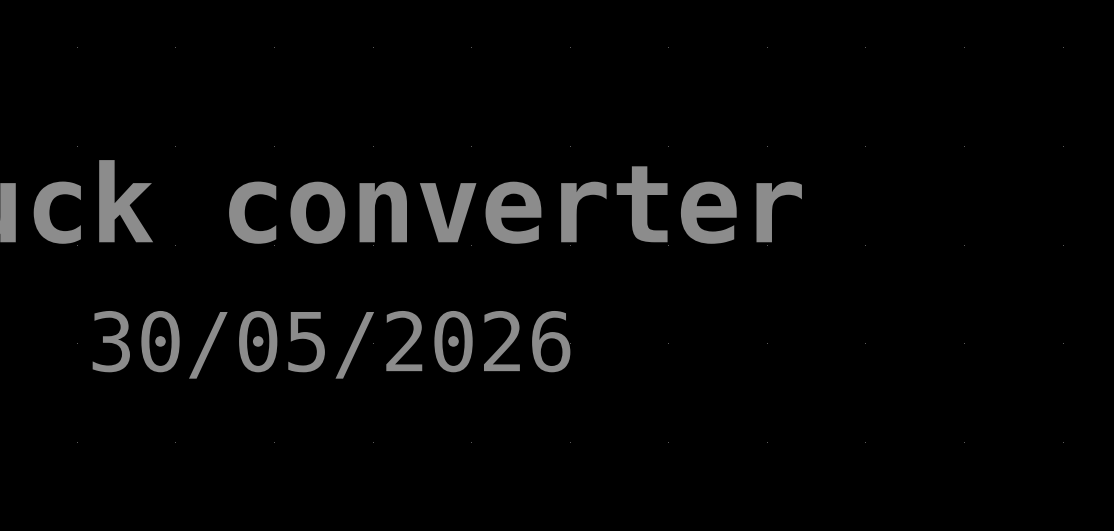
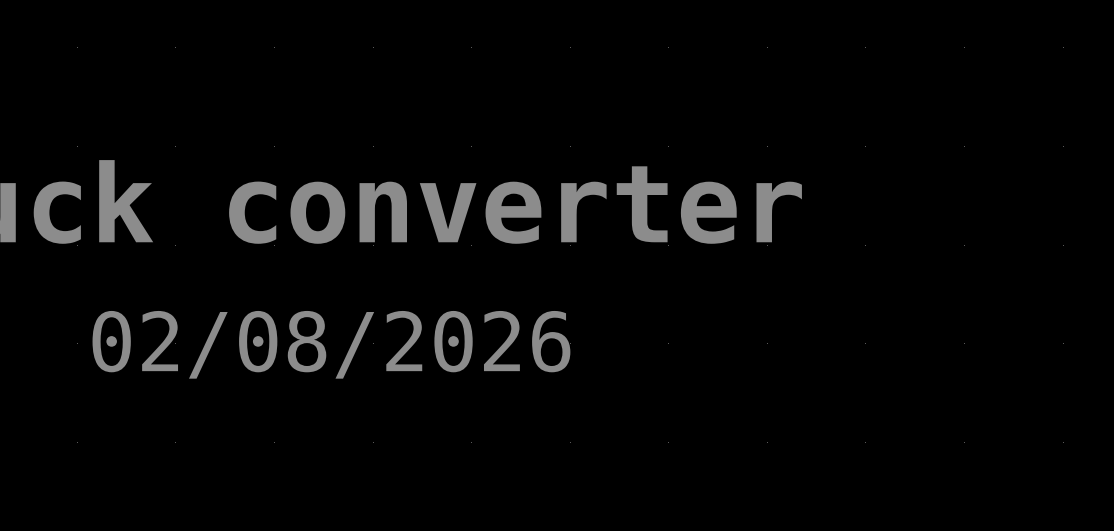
text: 30/05/2026 (331, 344) -> 02/08/2026 (331, 344)

